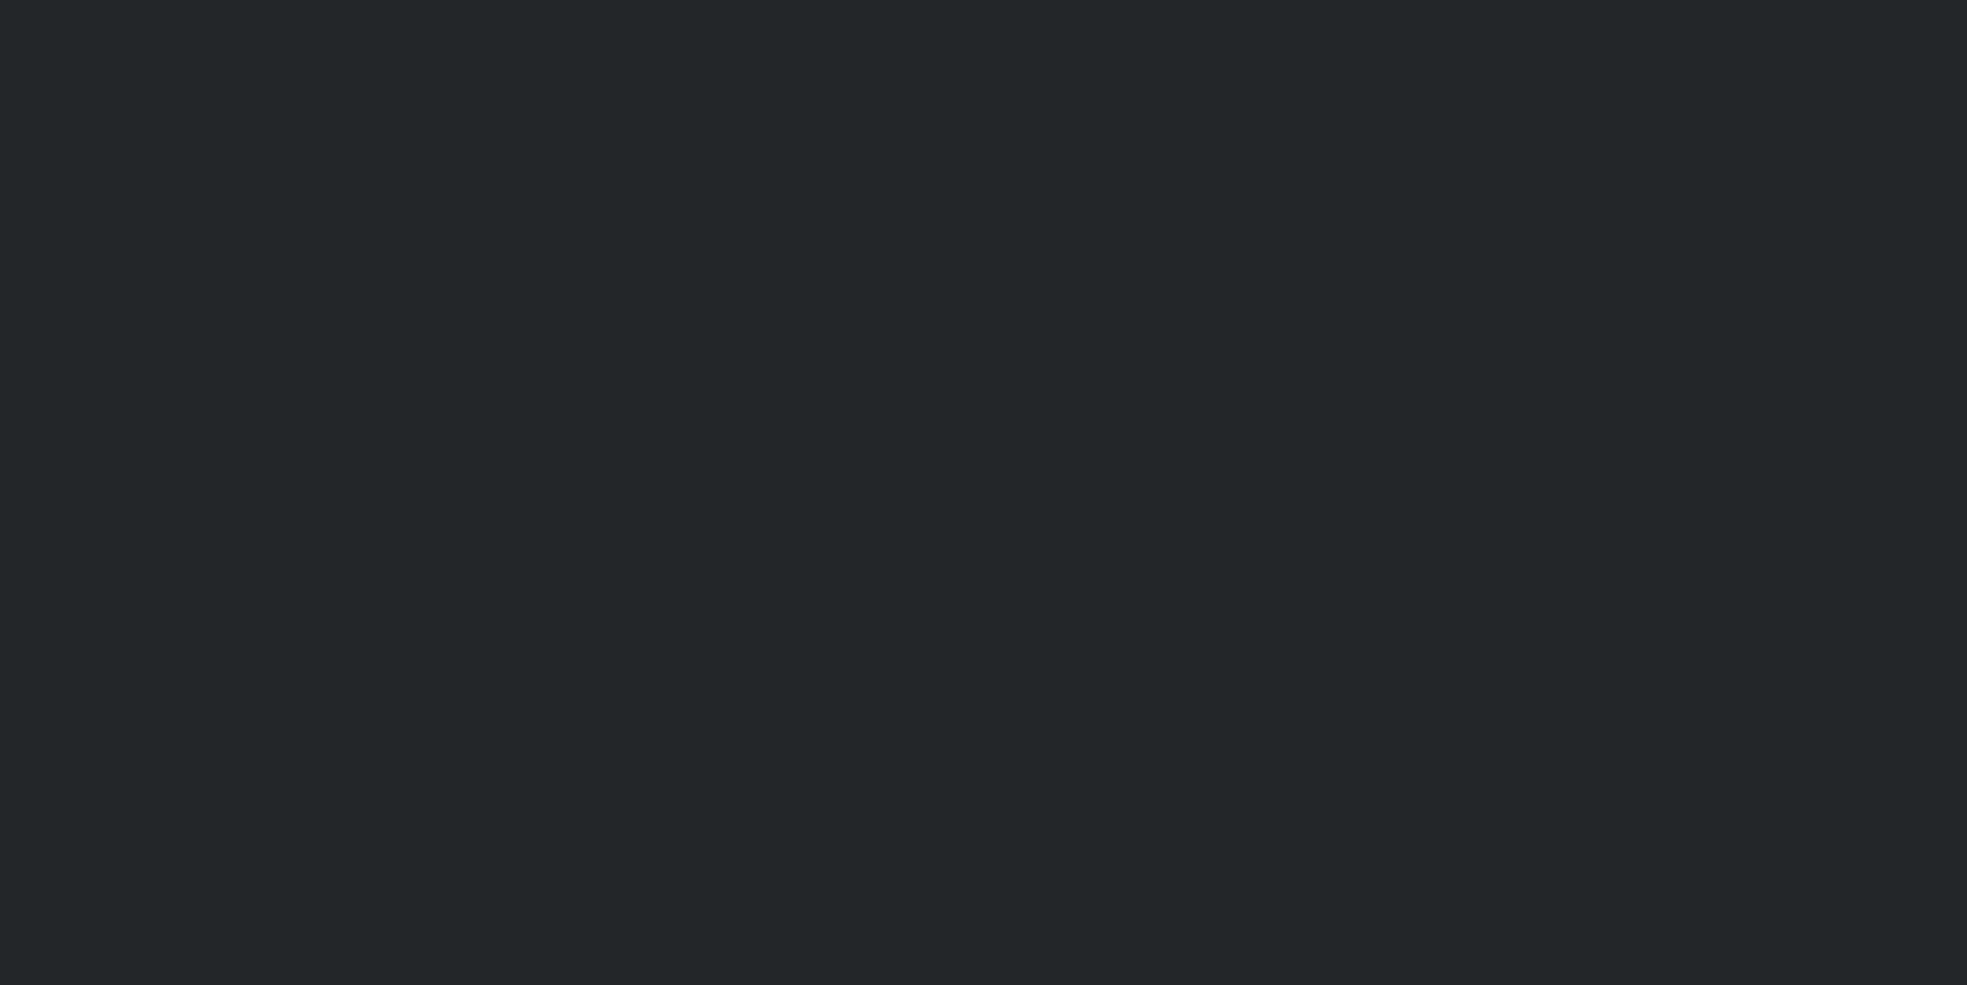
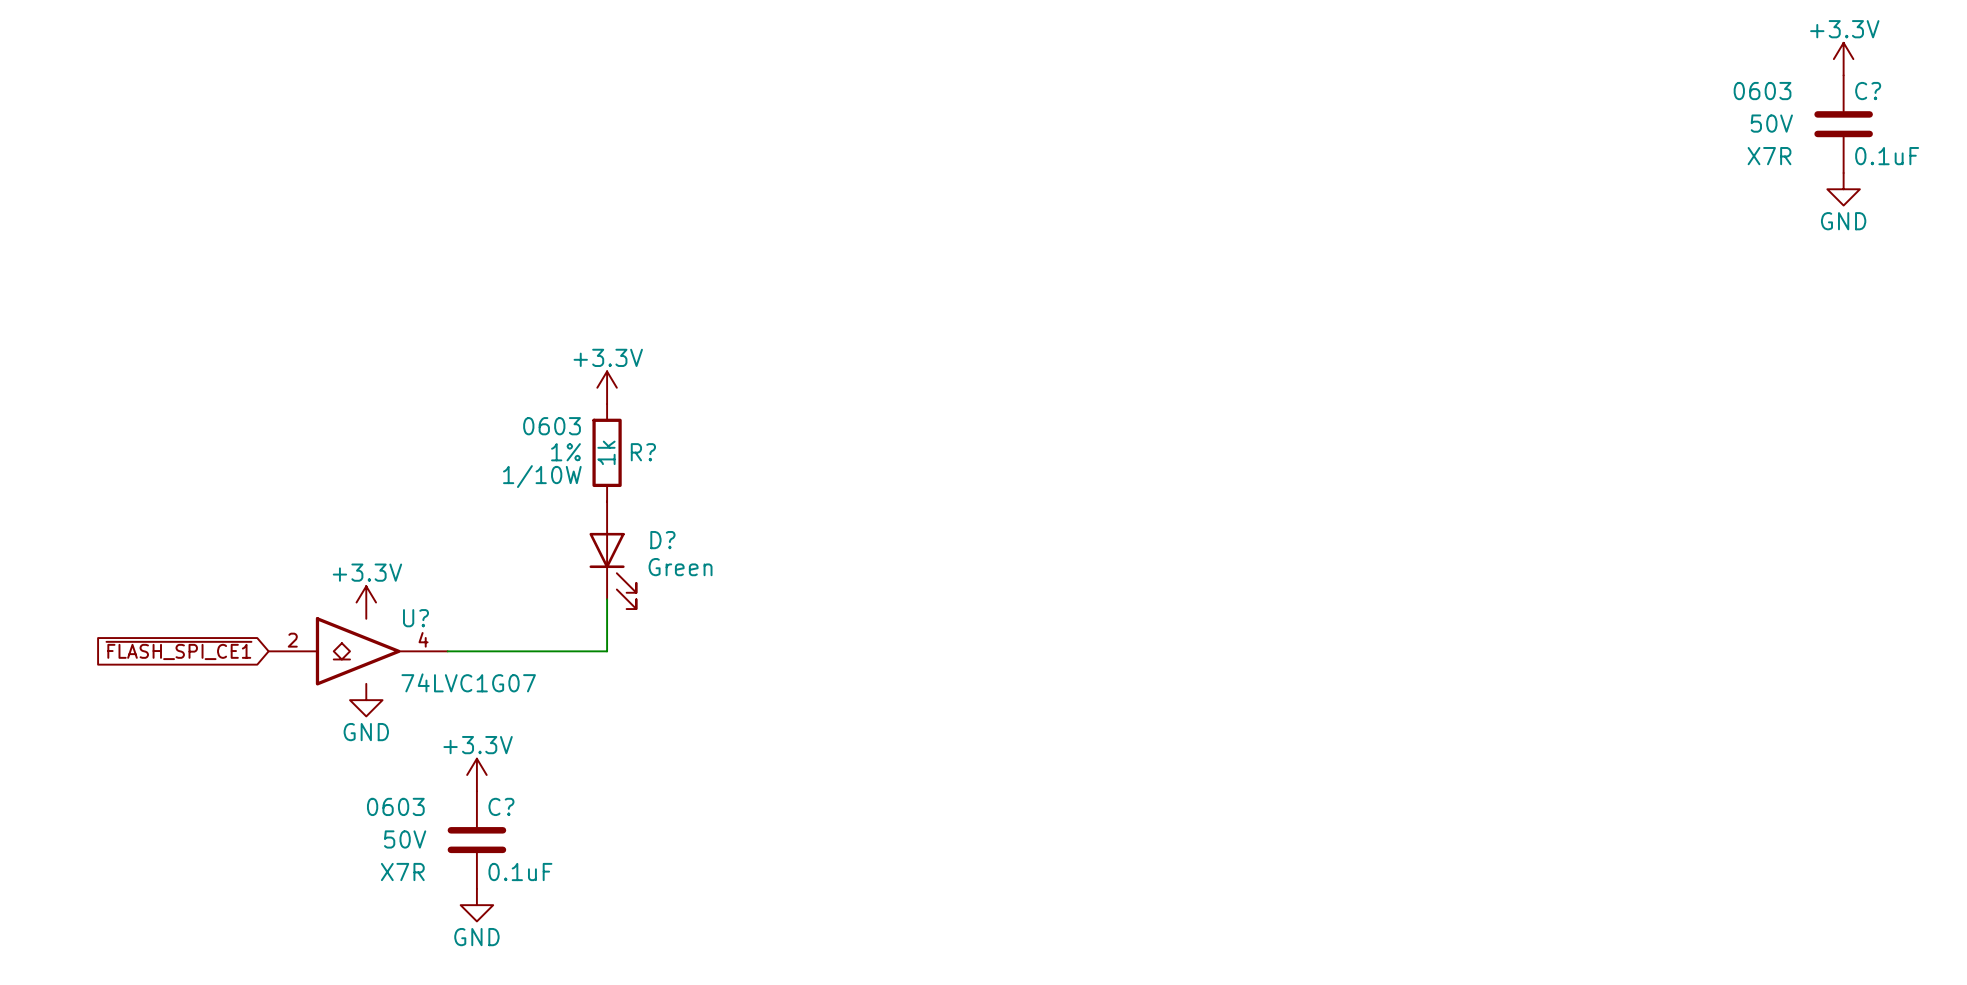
power symbol: none -> +3.3V (1843, 59)
C?: none -> 0.1uF (1843, 124)
power symbol: none -> GND (1843, 189)
power symbol: none -> +3.3V (607, 387)
R?: none -> 1k (607, 452)
D?: none -> Green (612, 555)
wire: none -> (607, 599) (607, 651) (447, 651)
power symbol: none -> +3.3V (366, 602)
global label: none -> ~{FLASH_SPI_CE1} (178, 650)
U?: none -> 74LVC1G07 (358, 651)
power symbol: none -> GND (366, 700)
power symbol: none -> +3.3V (476, 774)
C?: none -> 0.1uF (476, 840)
power symbol: none -> GND (476, 905)

